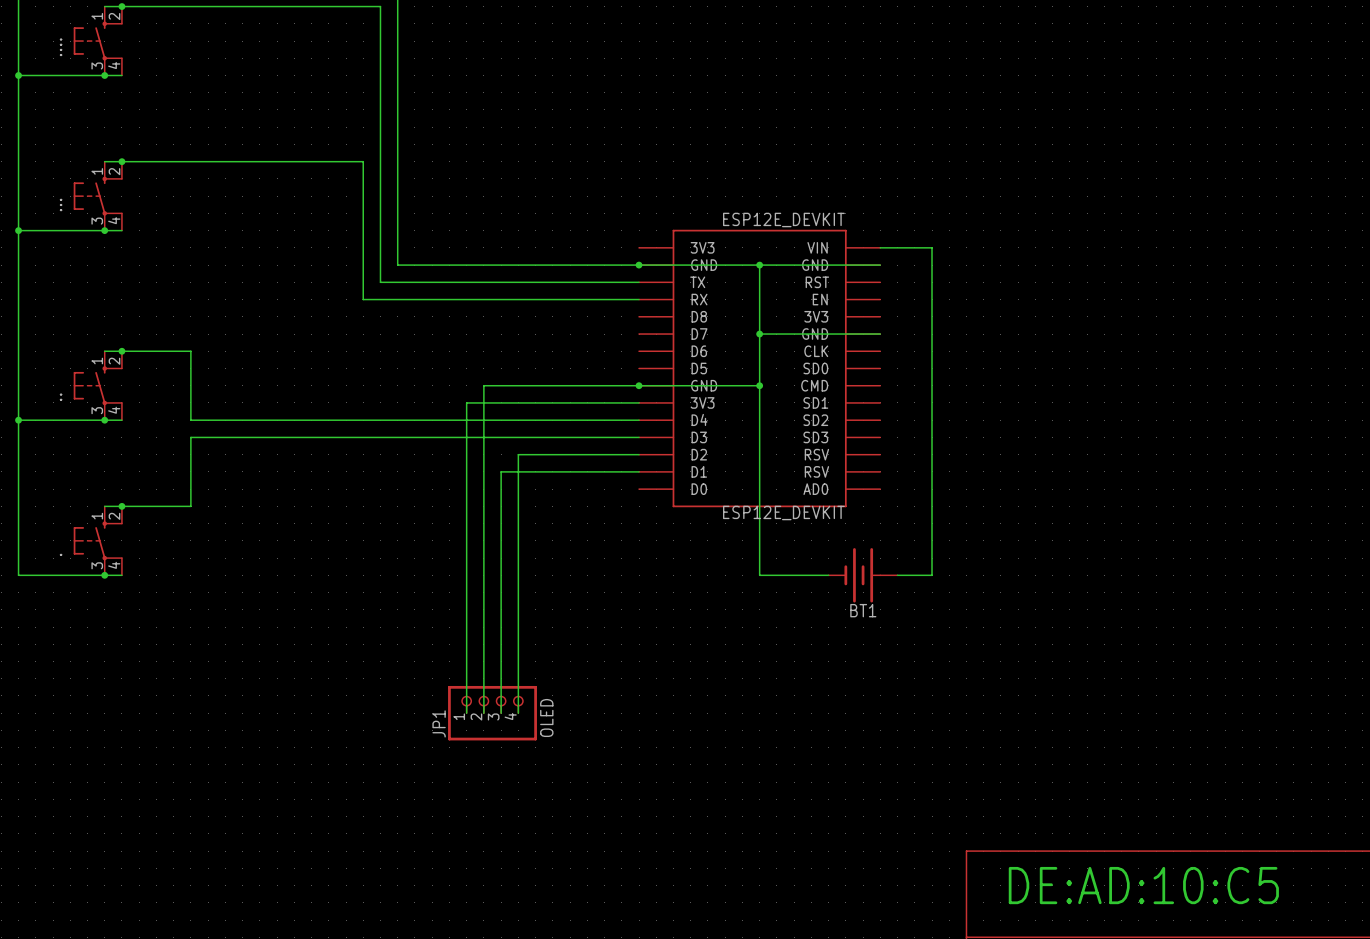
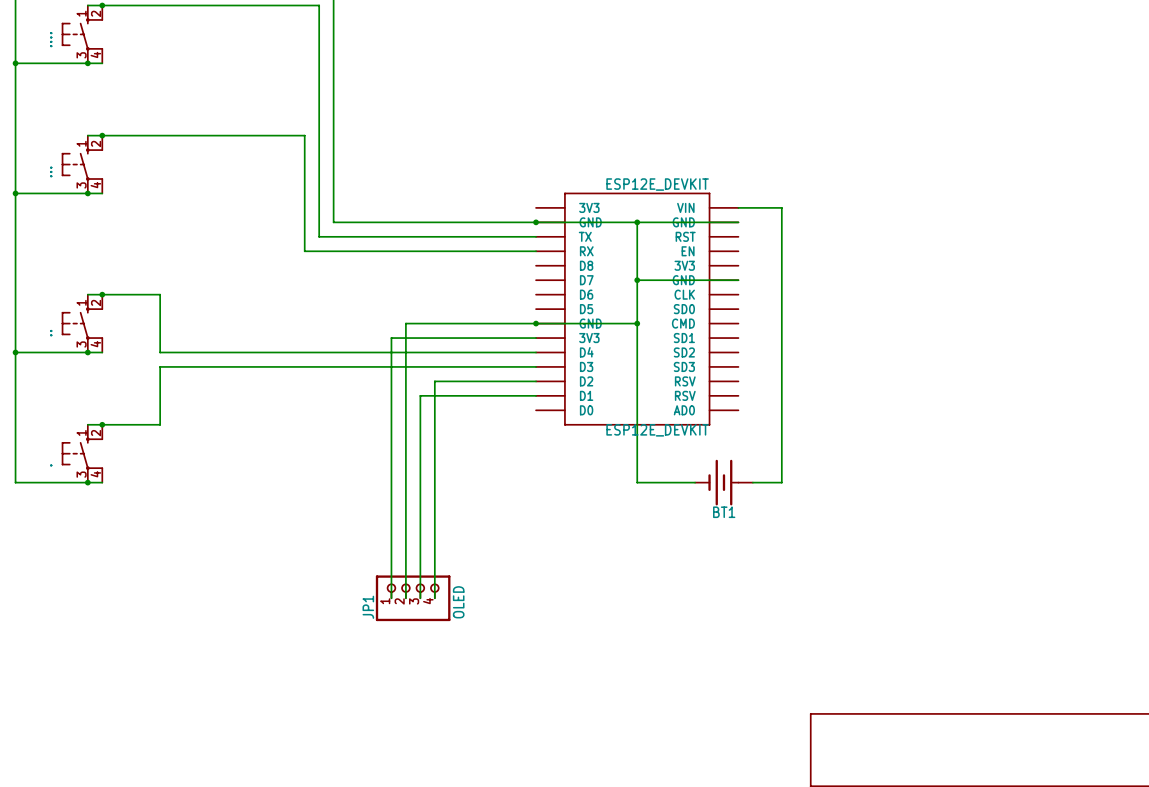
text: DE:AD:10:C5 (1143, 885) -> none

